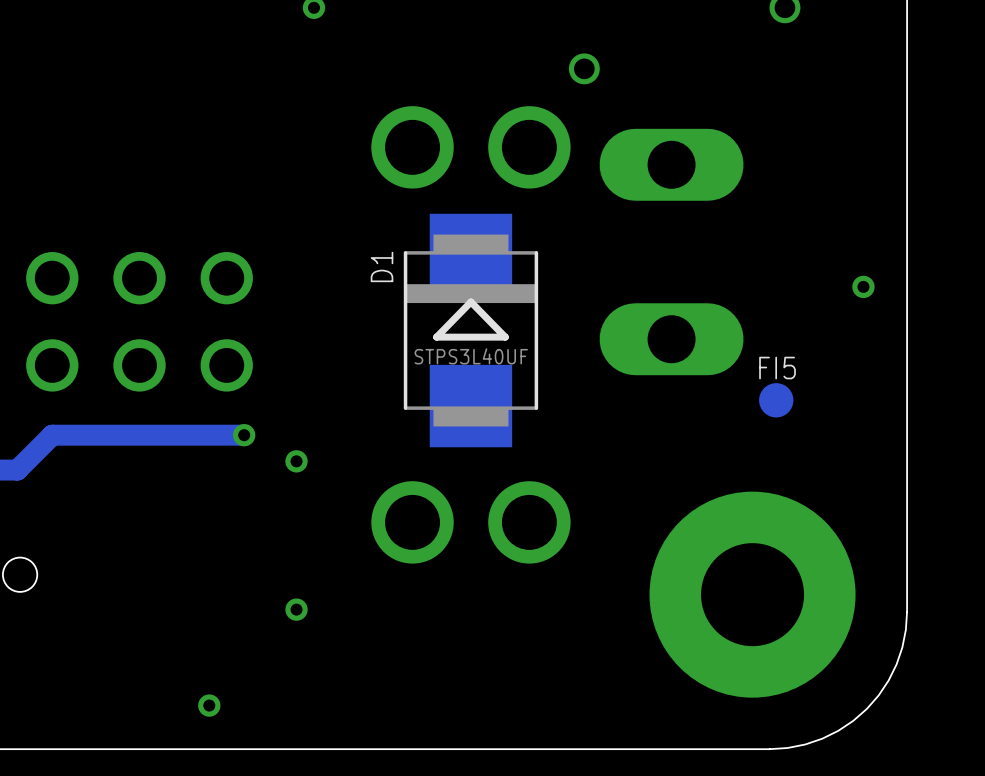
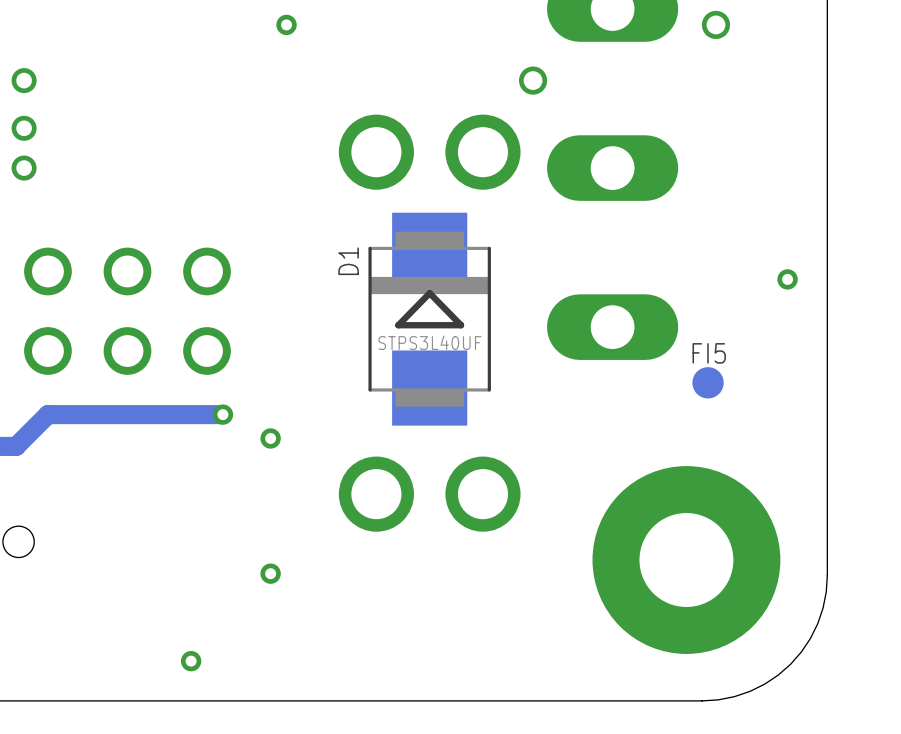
via: none -> (24, 80)
via: none -> (24, 128)
via: none -> (24, 168)

